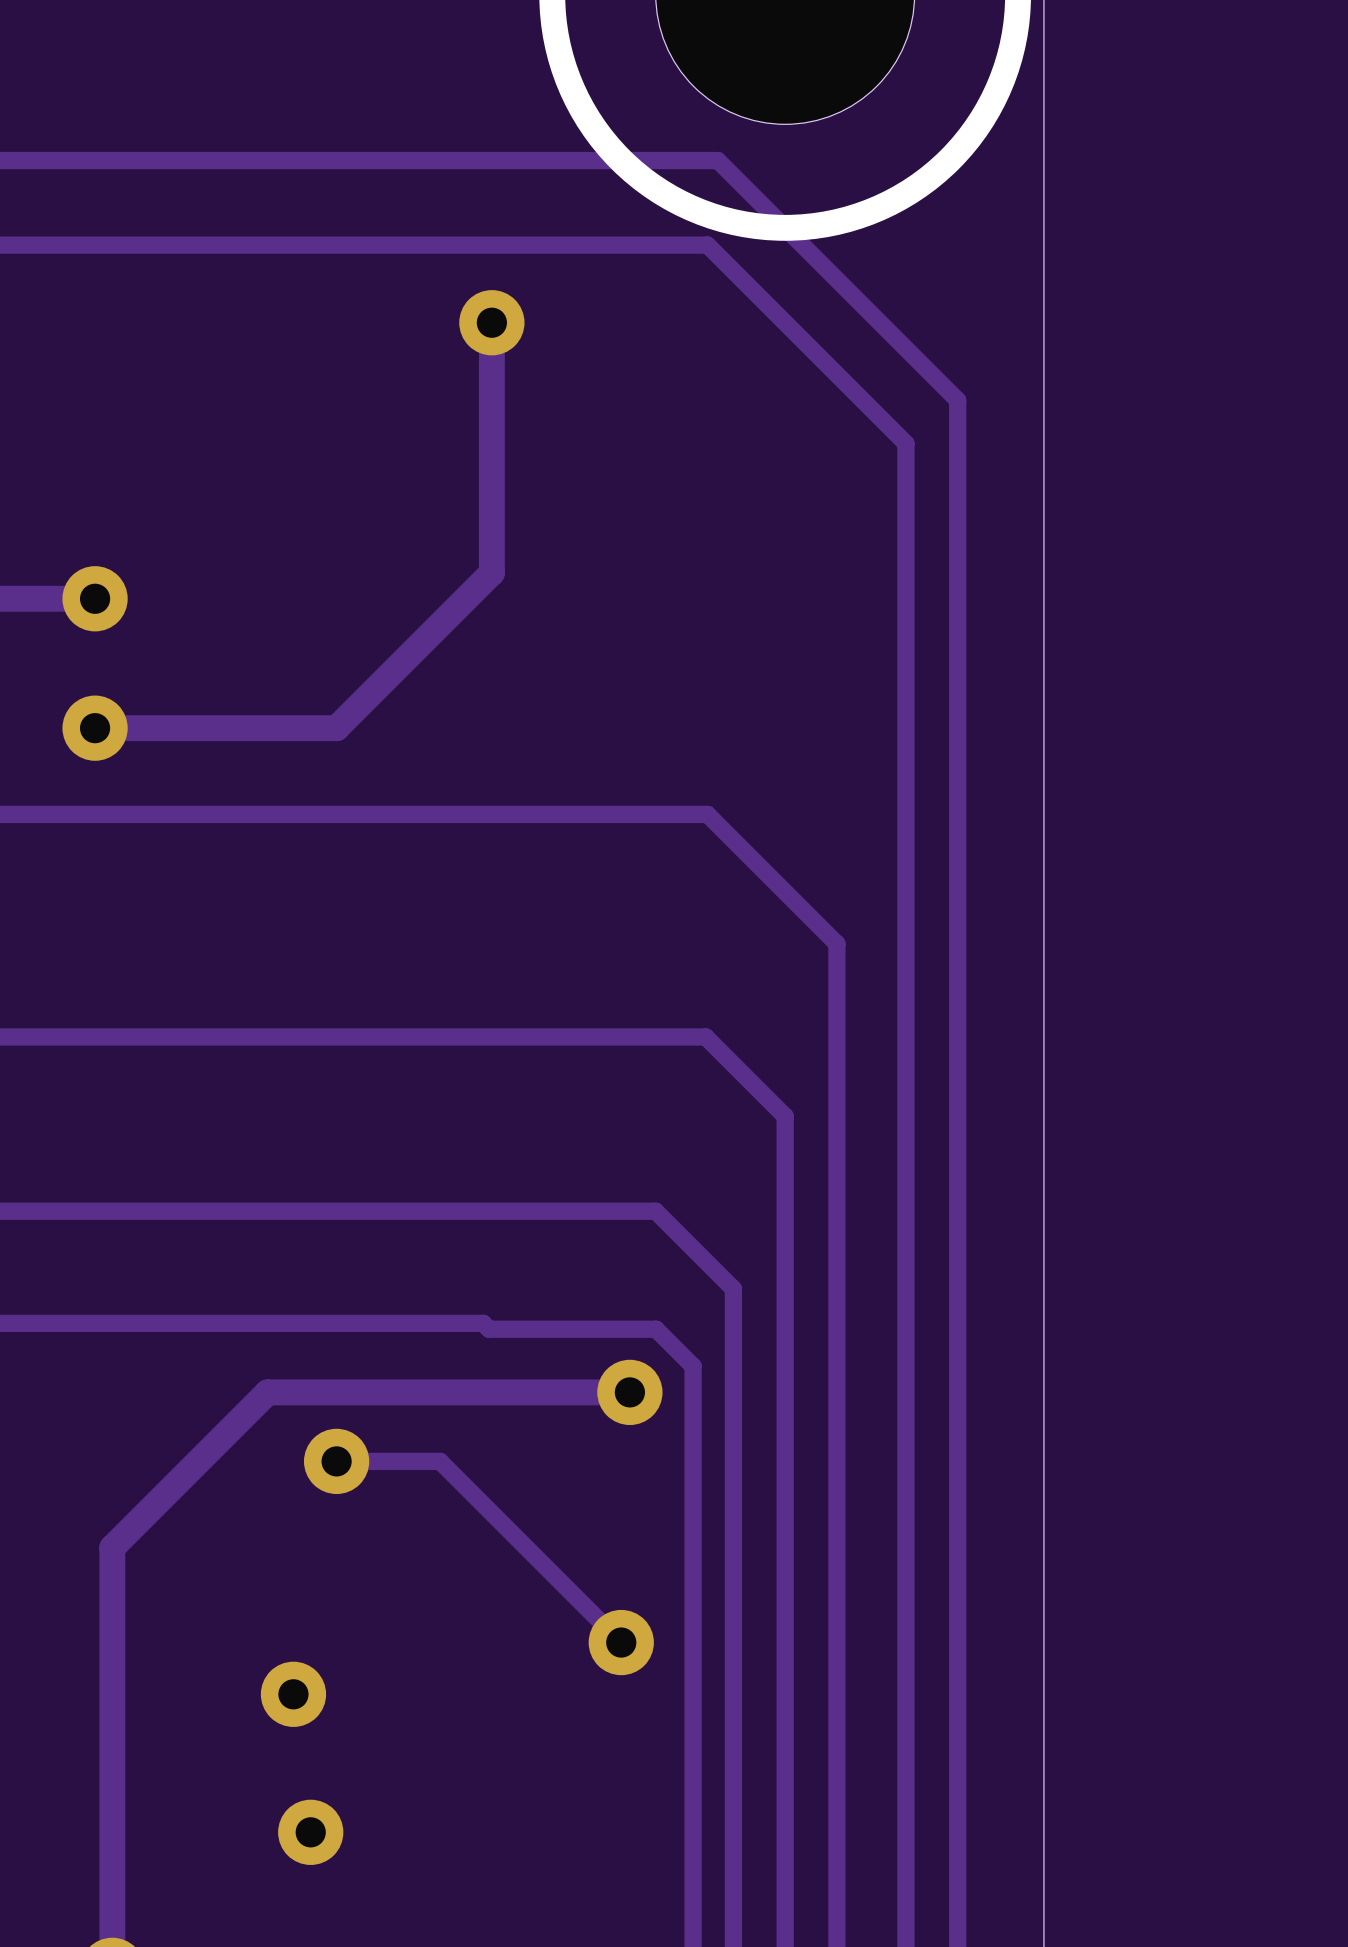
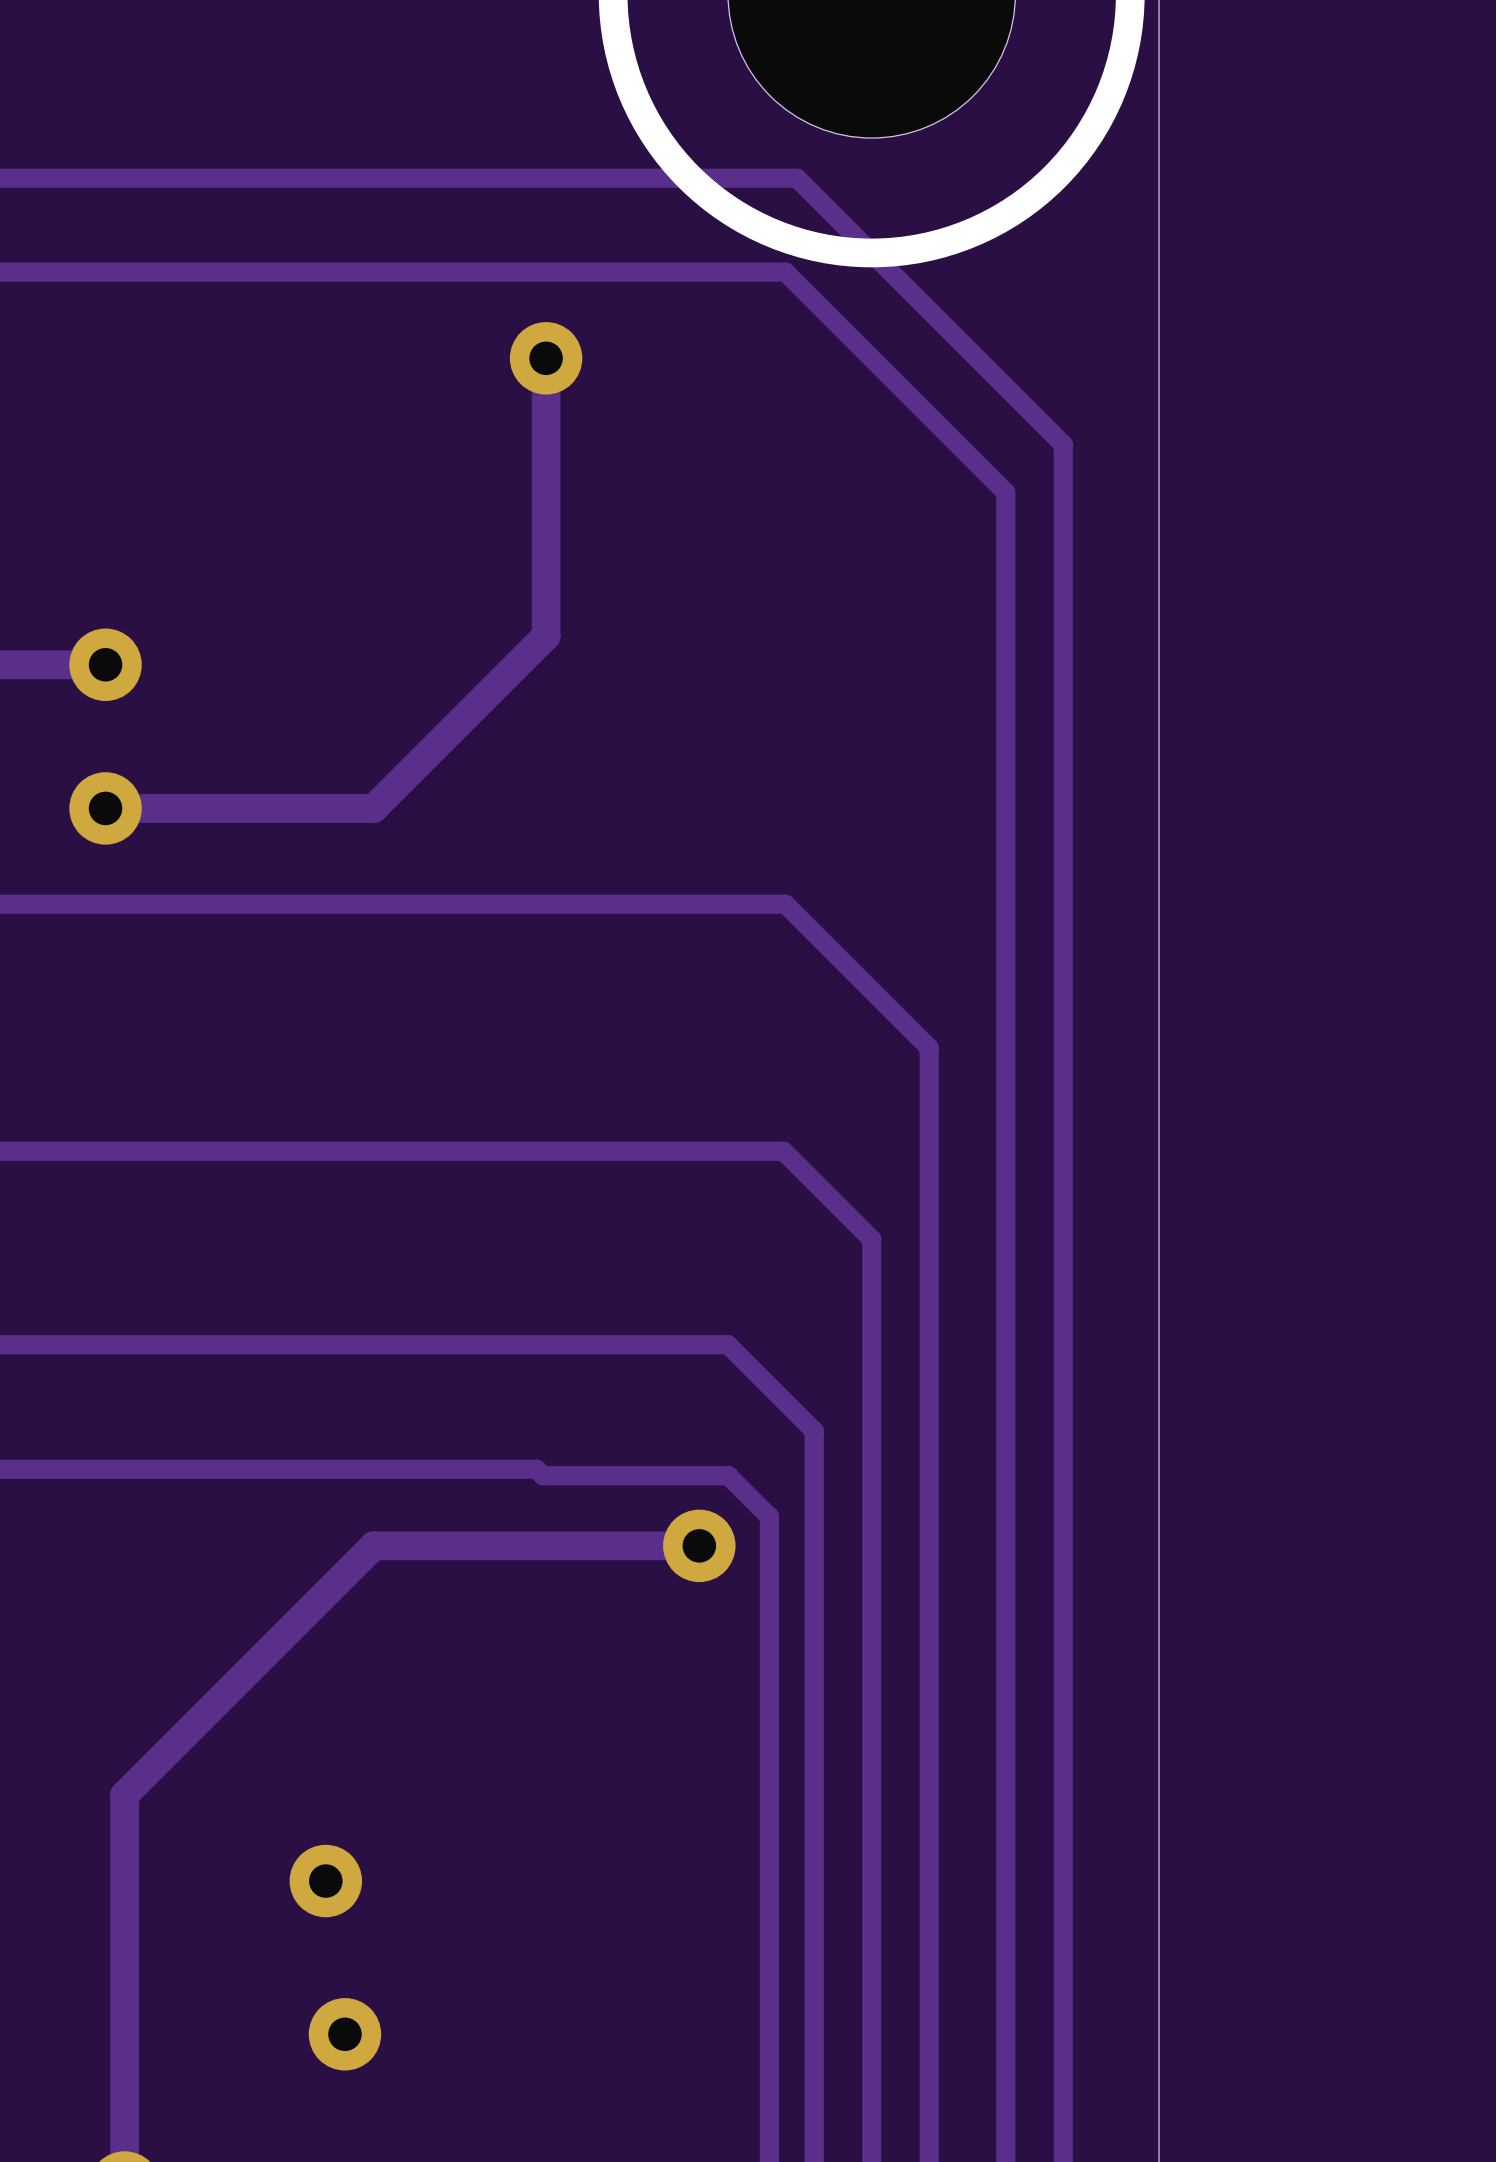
track: (336, 1392) (267, 1392) (112, 1547) (112, 1616) -> (373, 1545) (124, 1794)
track: (336, 1461) (440, 1461) (621, 1642) -> none
via: (336, 1461) -> none
via: (621, 1642) -> none

